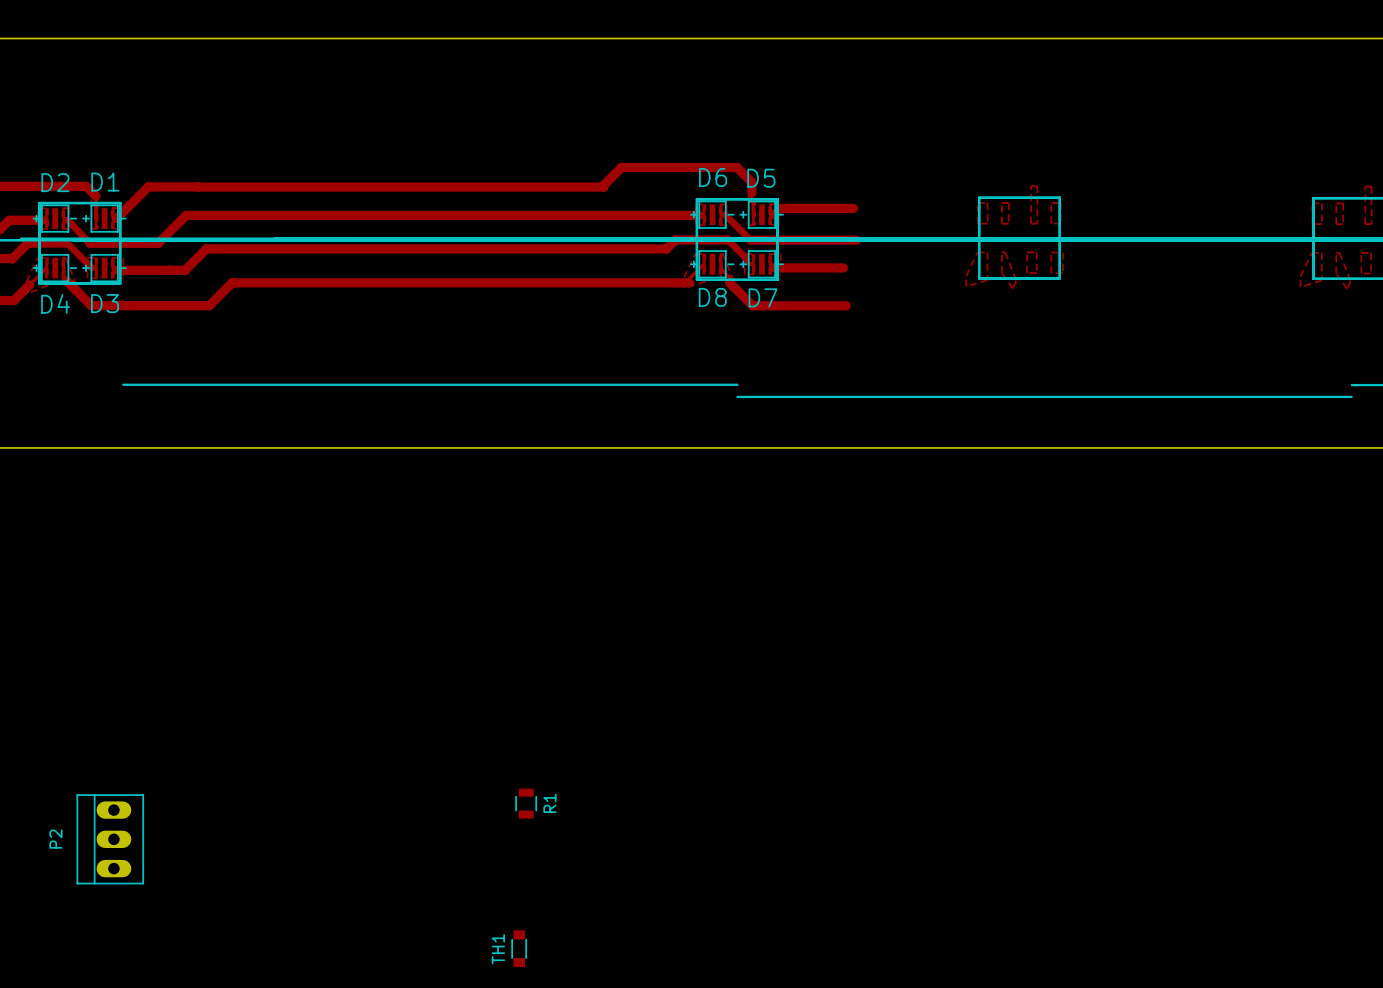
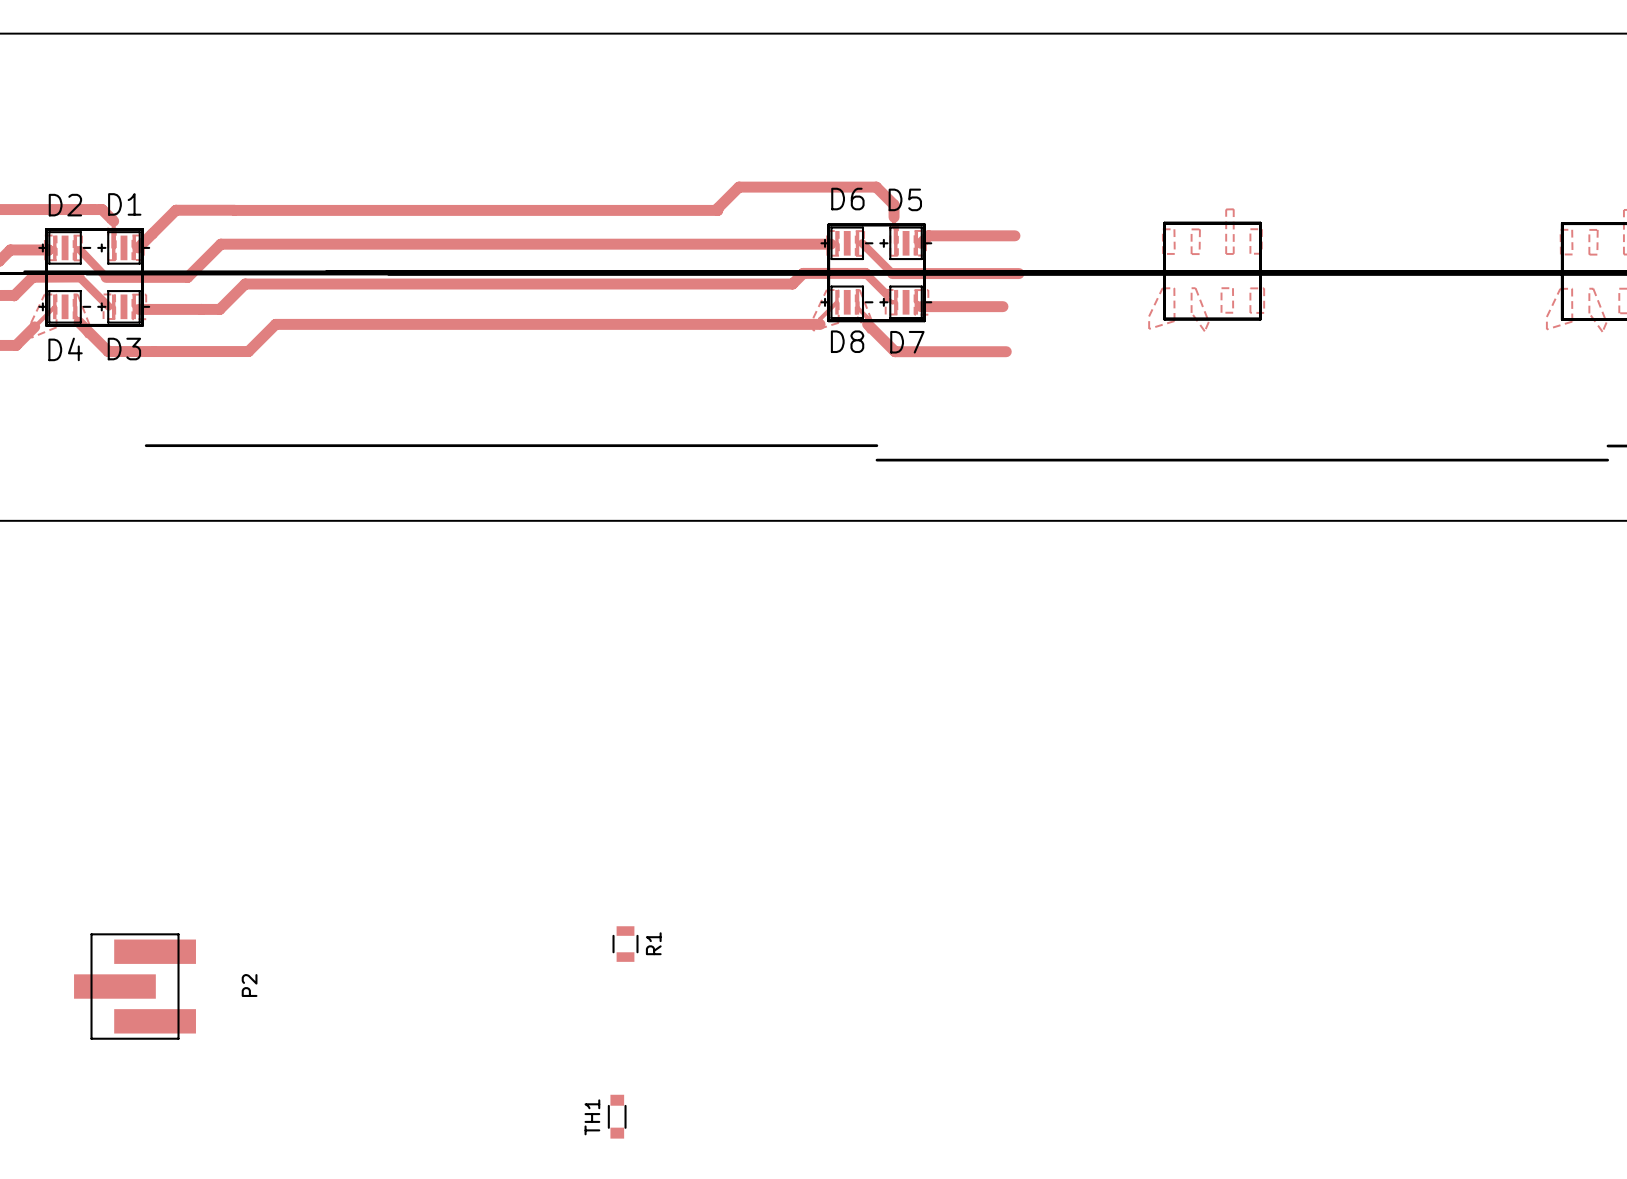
P2 footprint: [76, 794, 145, 885] -> [74, 933, 196, 1040]
P2 name position: P2 (55, 839) -> P2 (249, 985)

